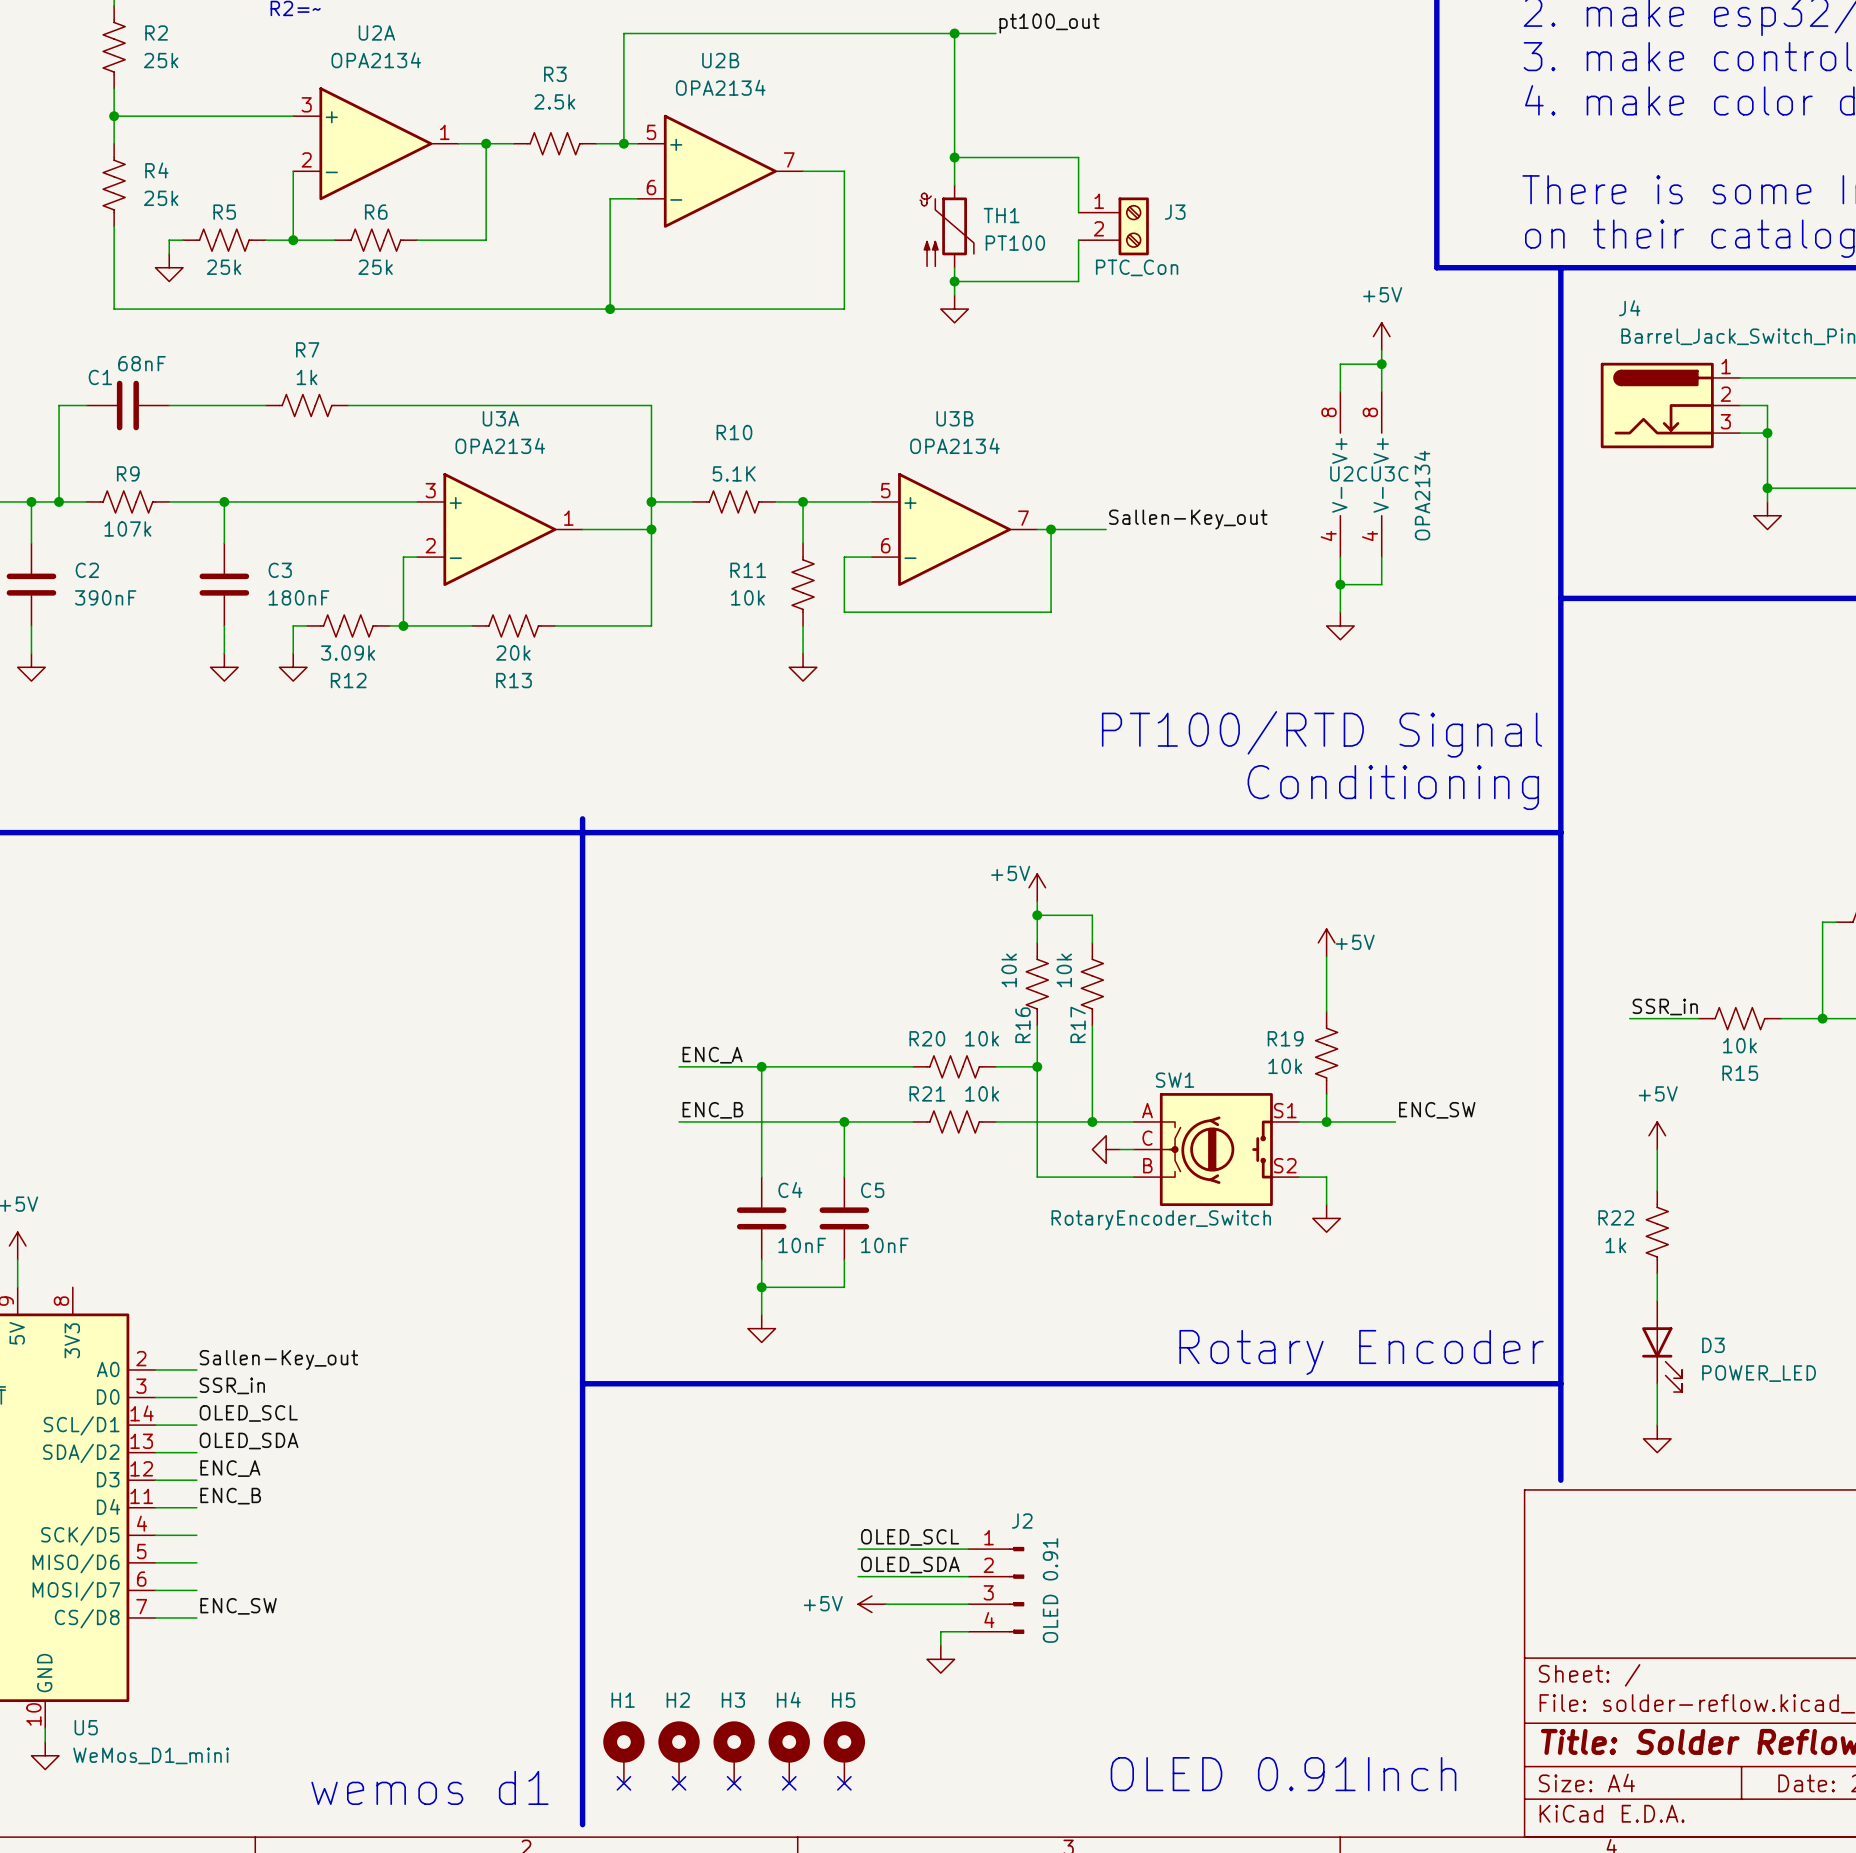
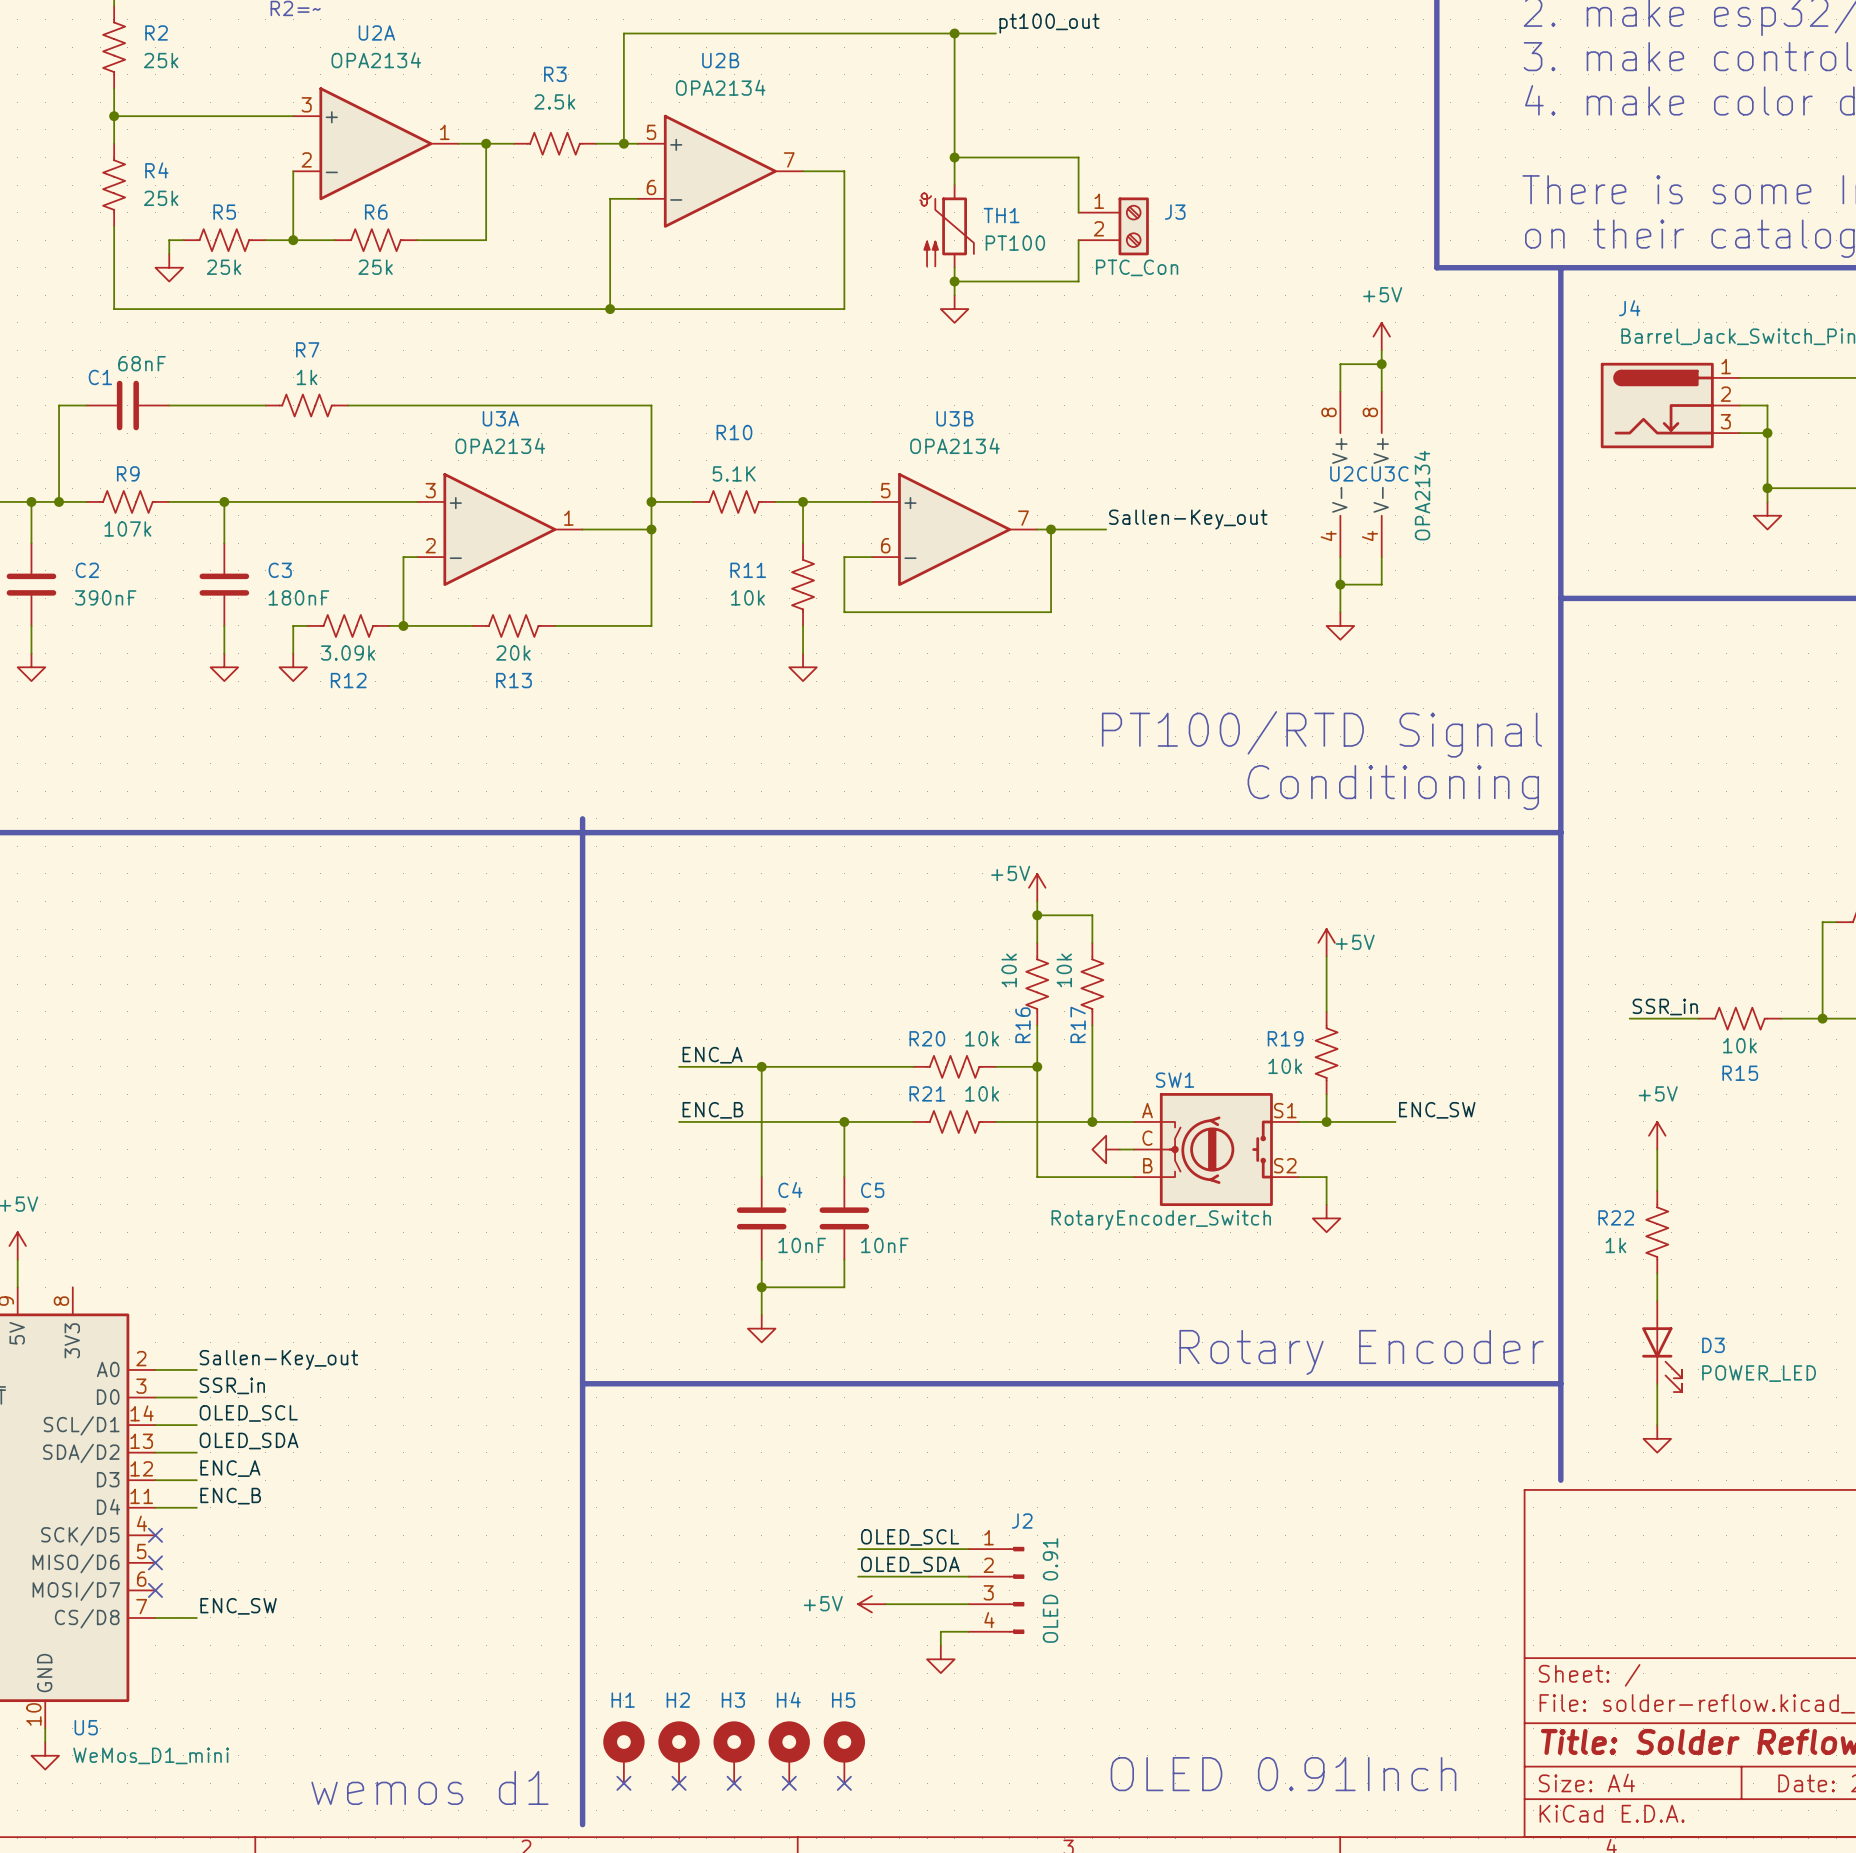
wire: (155, 1535) (196, 1535) -> none
no-connect mark: none -> (155, 1535)
wire: (155, 1562) (196, 1562) -> none
no-connect mark: none -> (155, 1562)
wire: (155, 1590) (196, 1590) -> none
no-connect mark: none -> (155, 1590)

